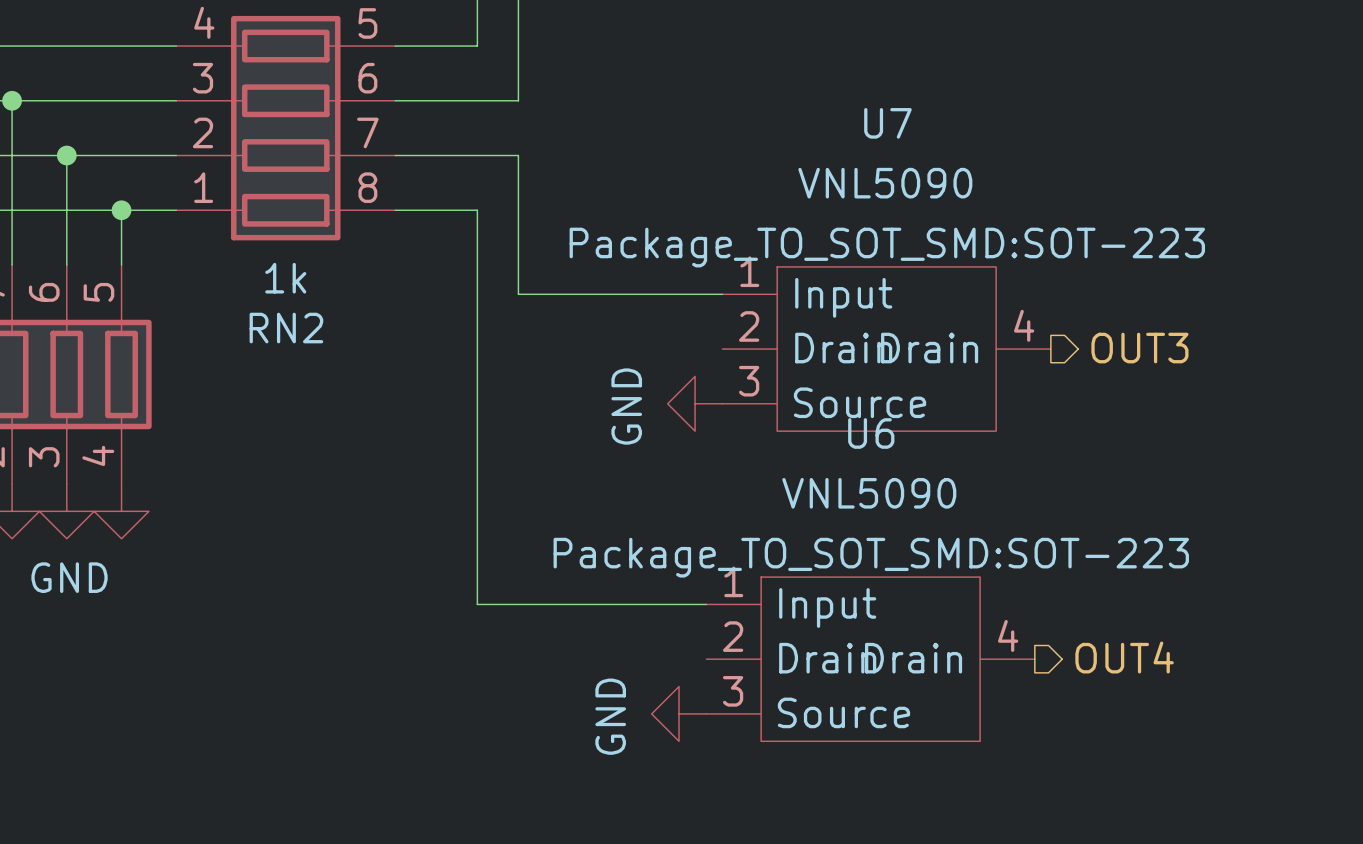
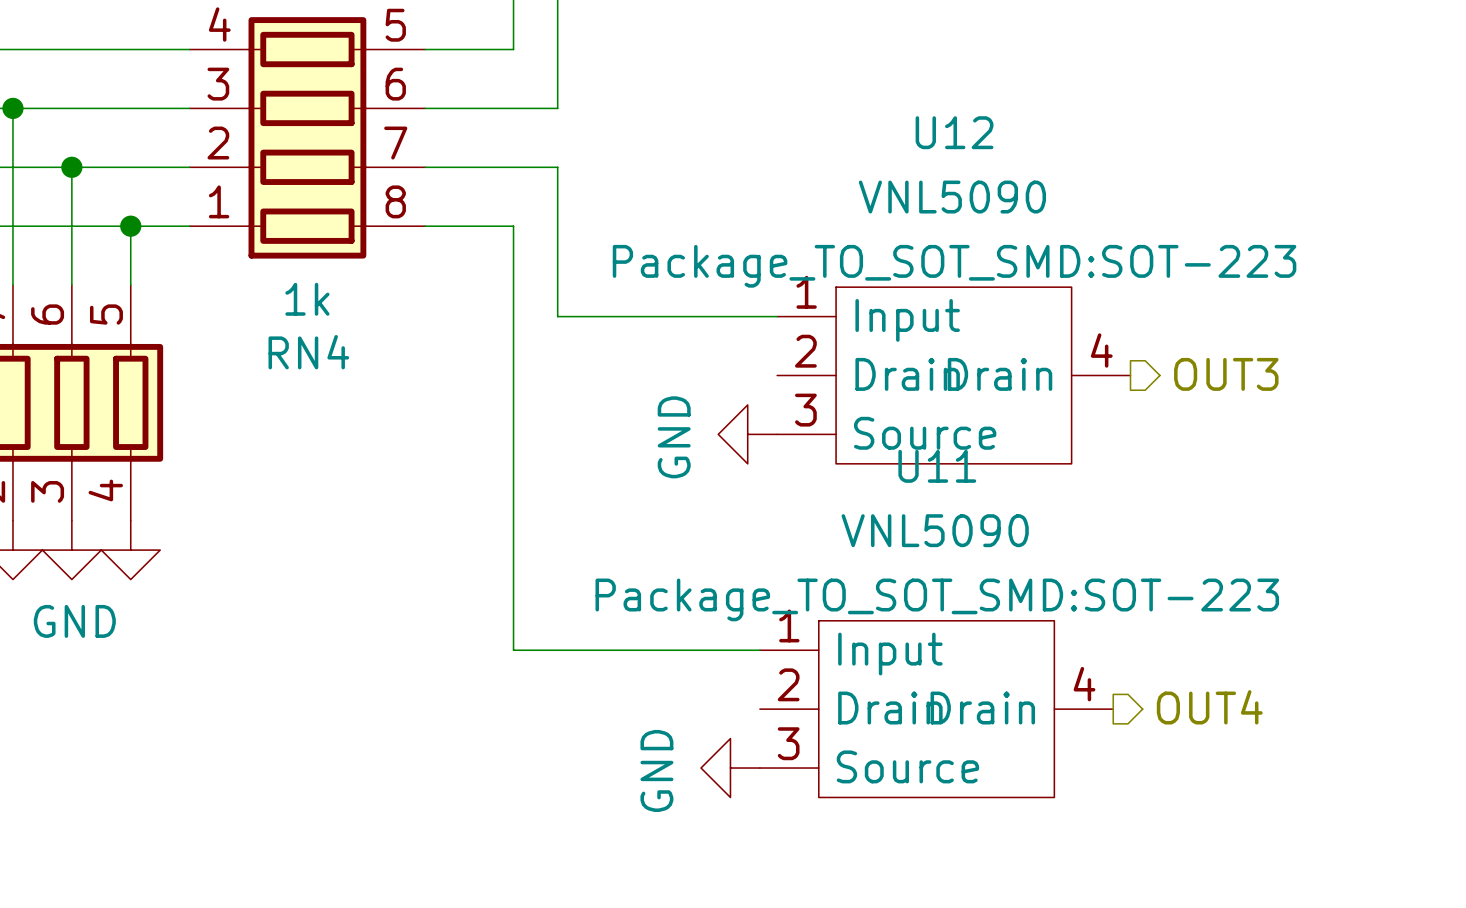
U7 name: U7 (887, 123) -> U12 (954, 132)
RN2 name: RN2 (286, 328) -> RN4 (308, 352)
U6 name: U6 (871, 433) -> U11 (937, 466)

